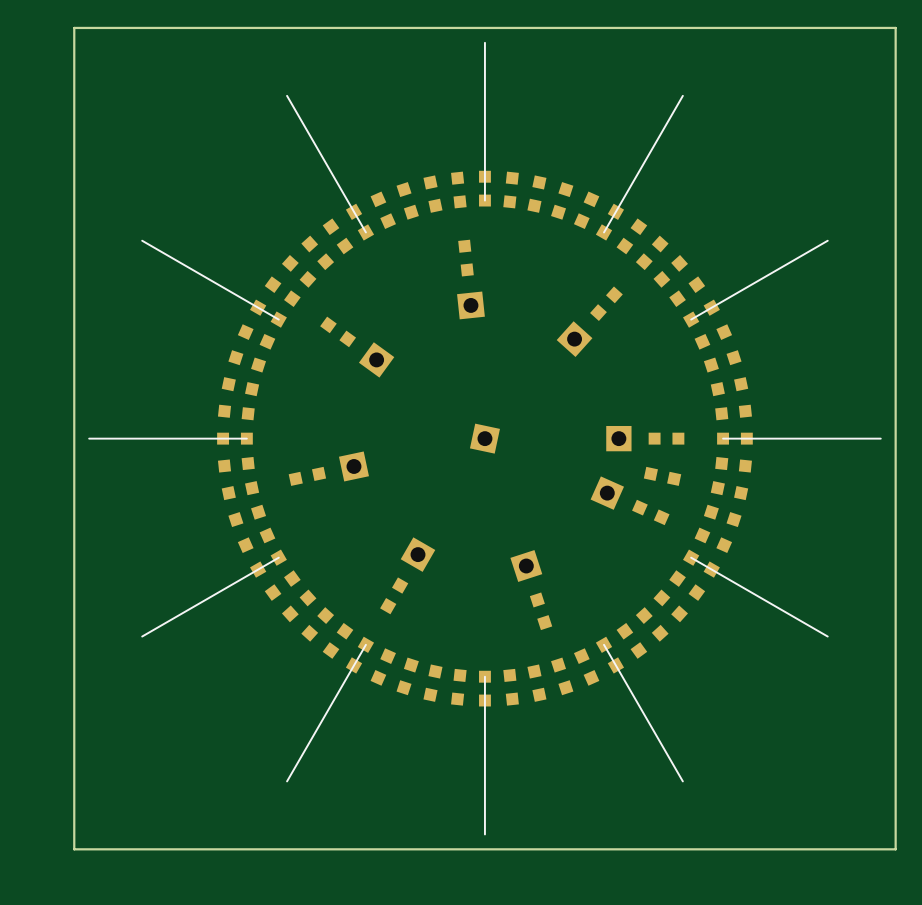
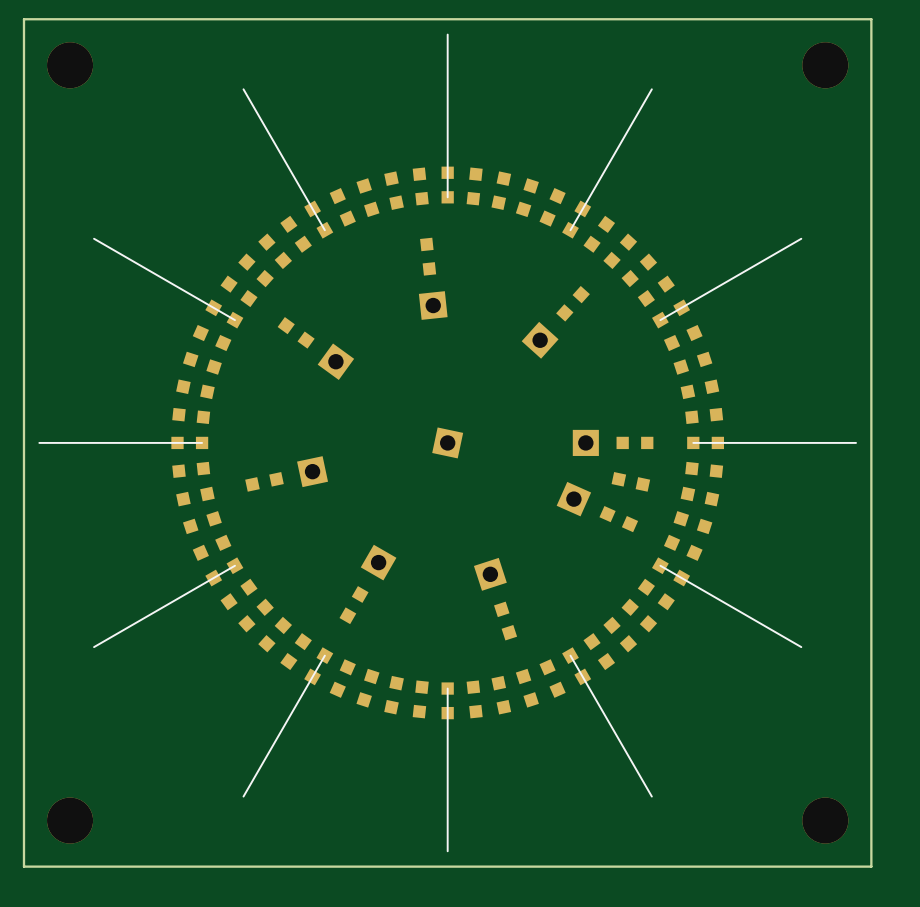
part: none -> (70, 65)
part: none -> (825, 65)
part: none -> (70, 820)
part: none -> (825, 820)

